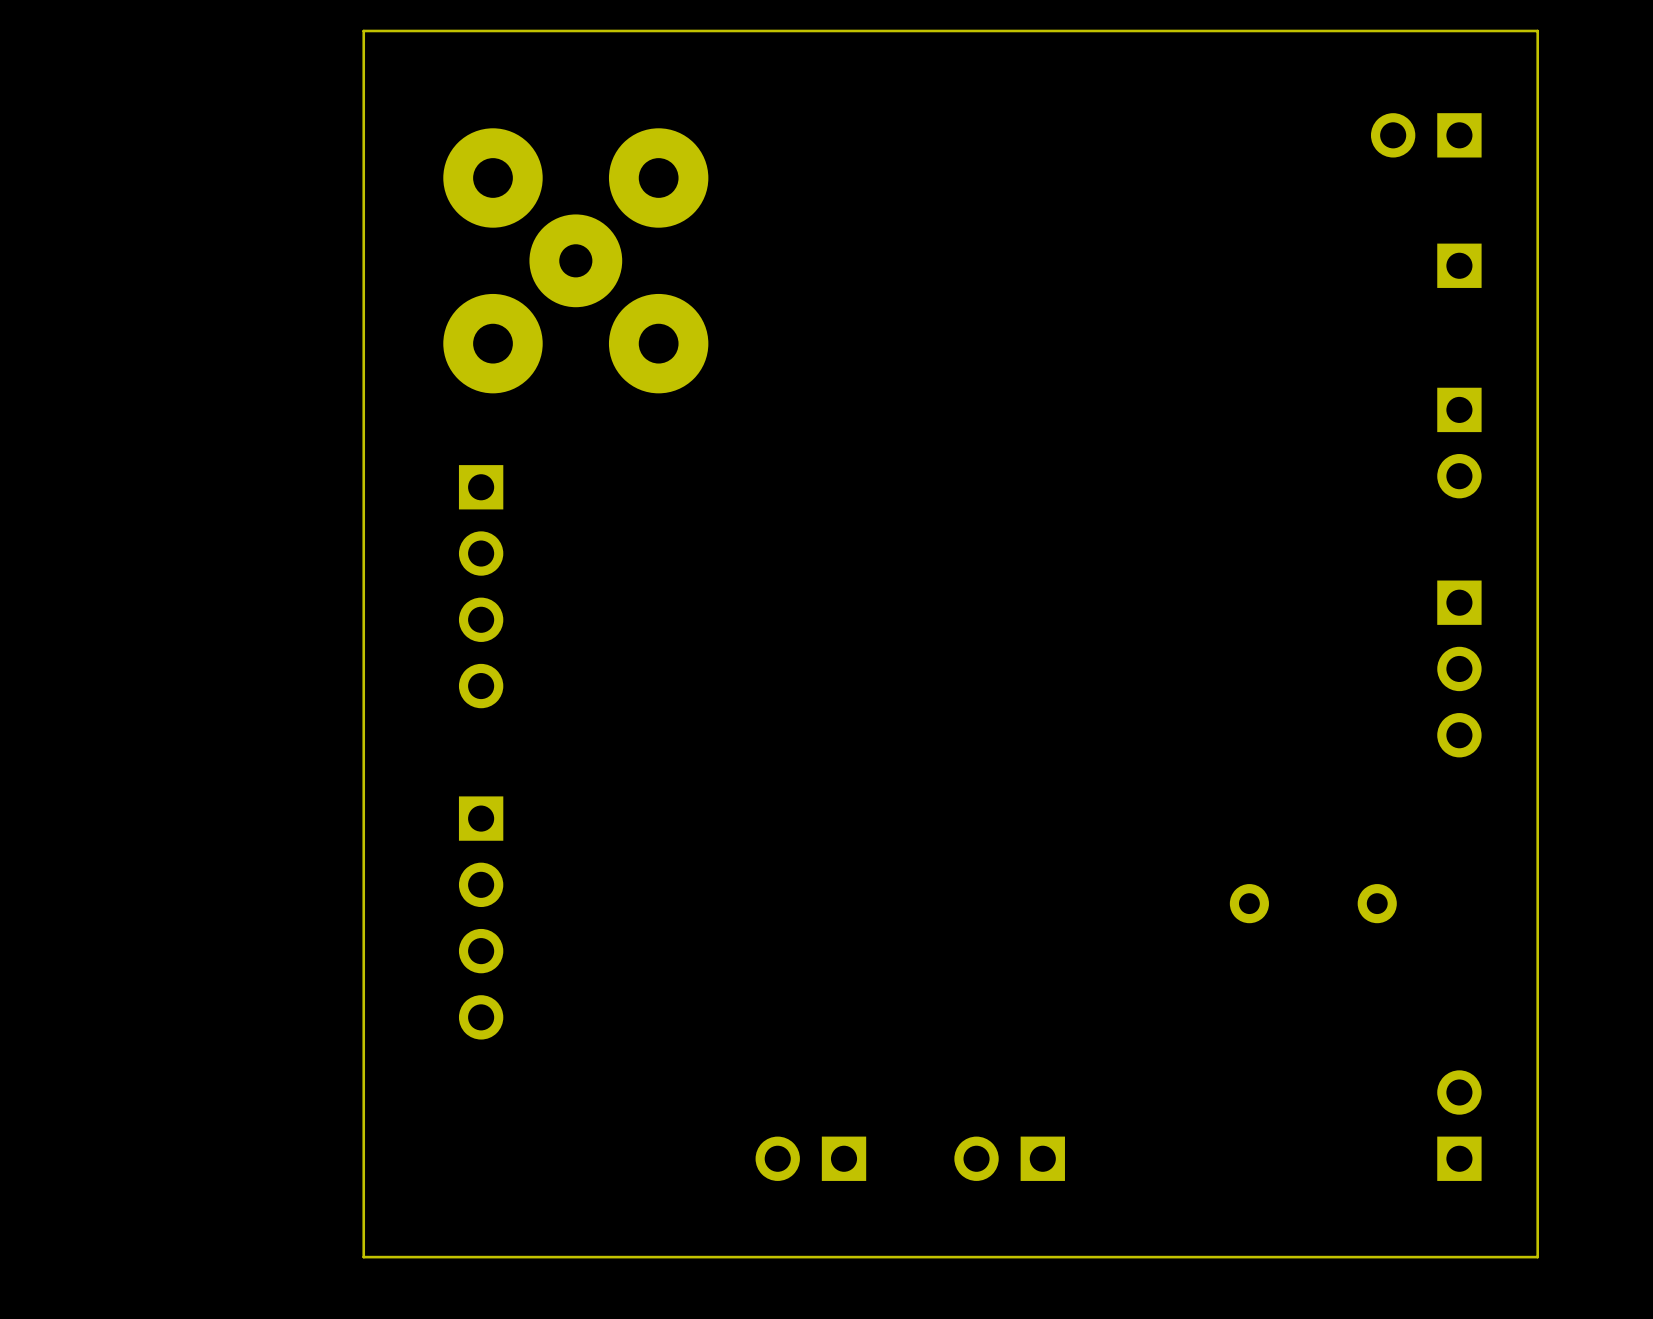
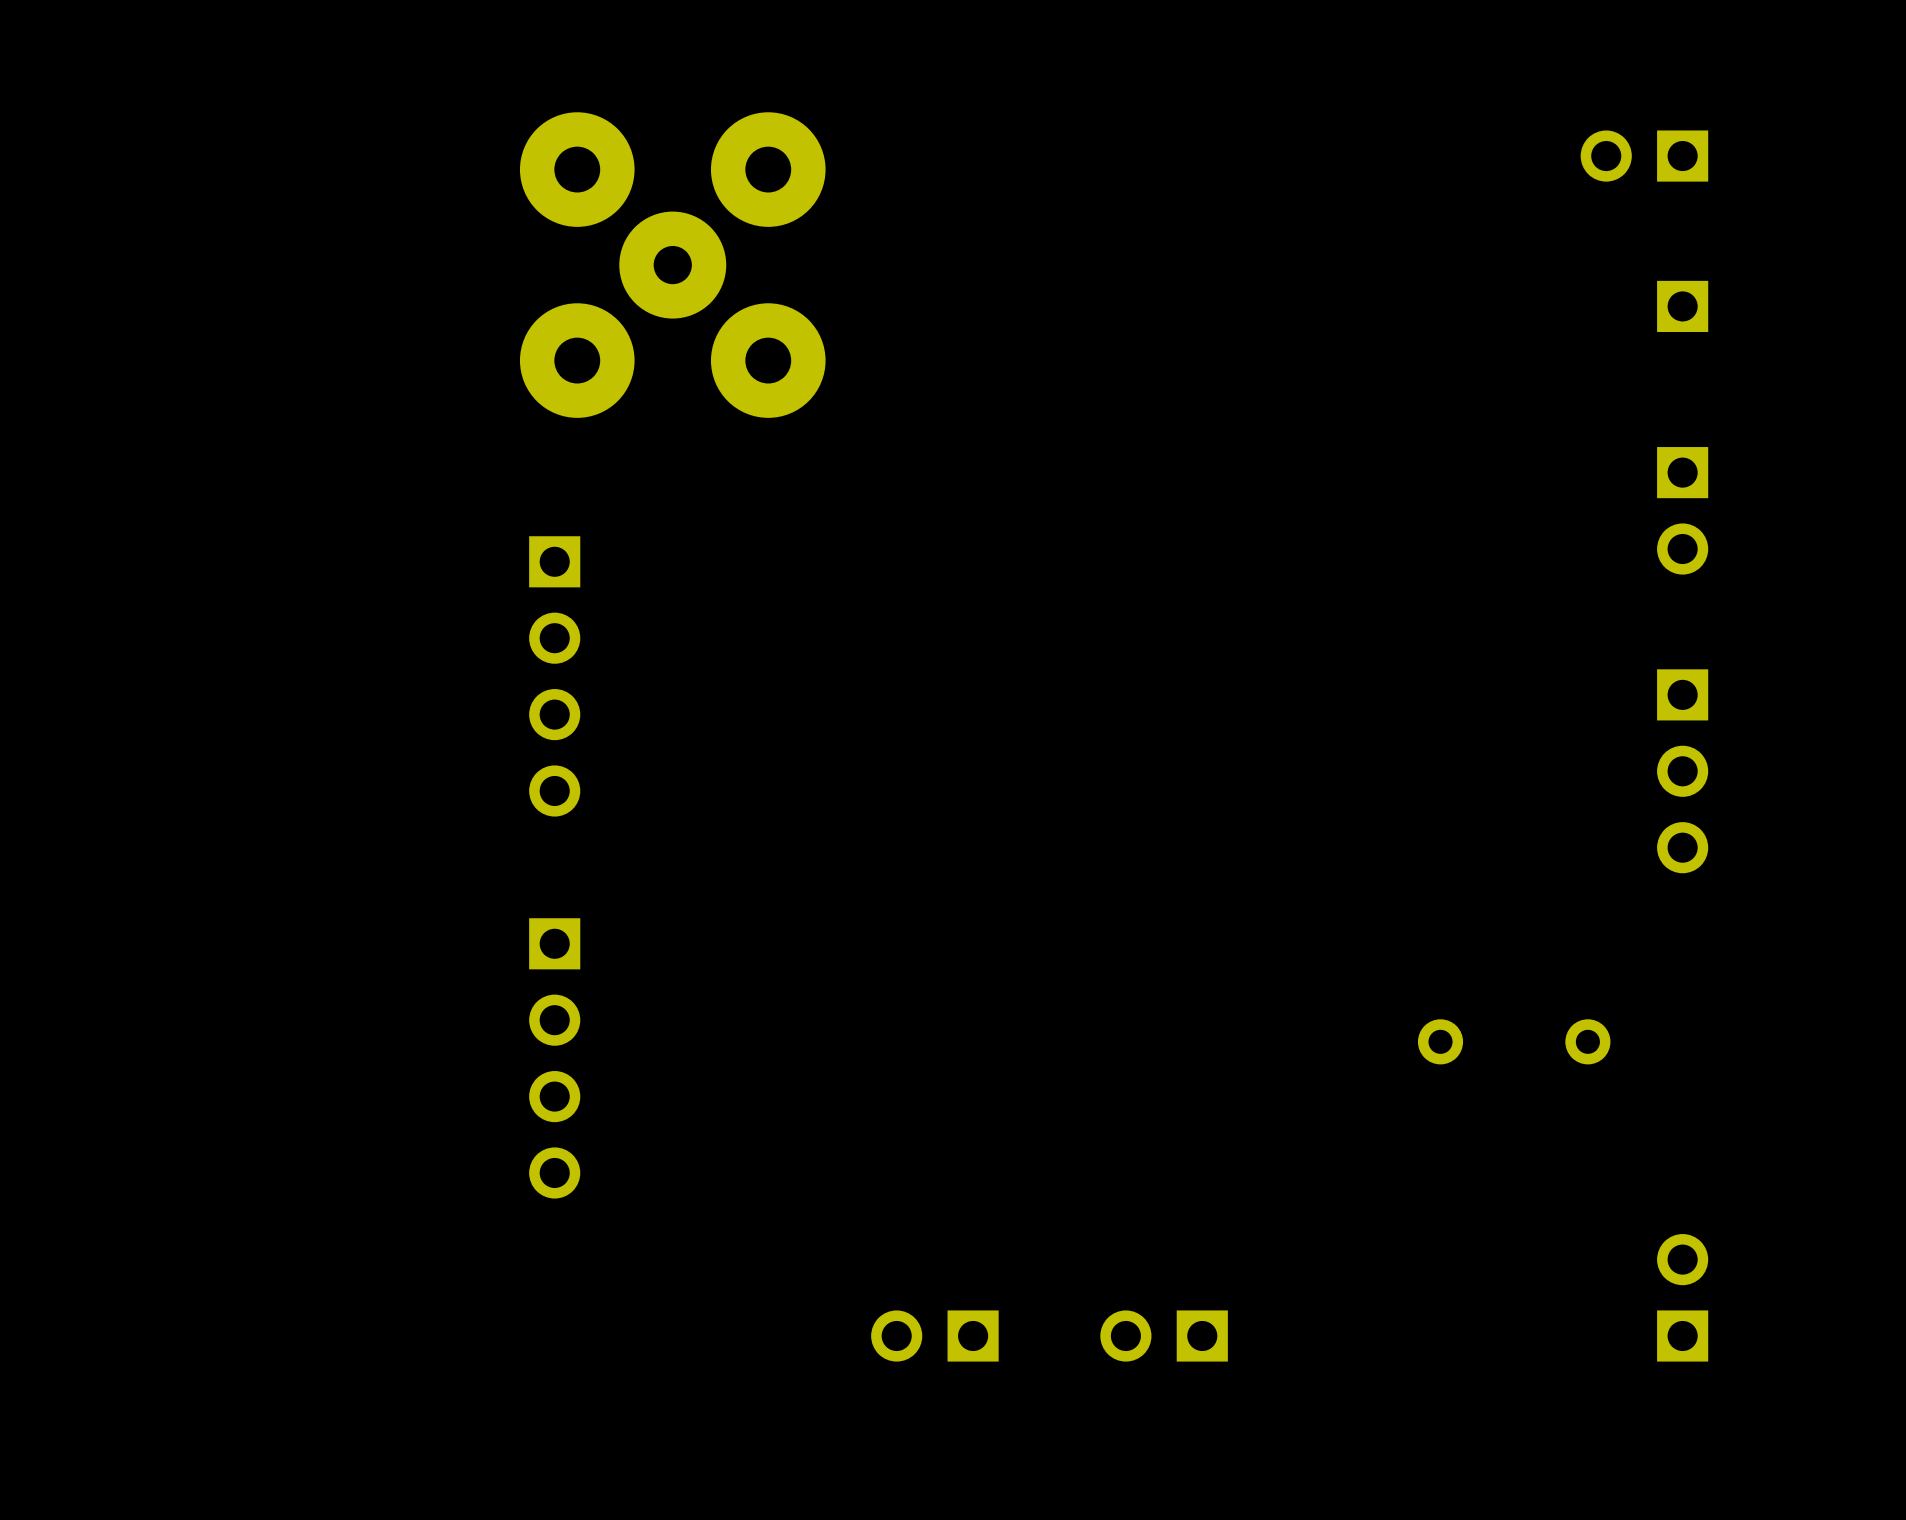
board edge: (1537, 30) (363, 30) (363, 1257) (1537, 1257) (1537, 30) -> none
part position: (575, 260) -> (672, 265)

